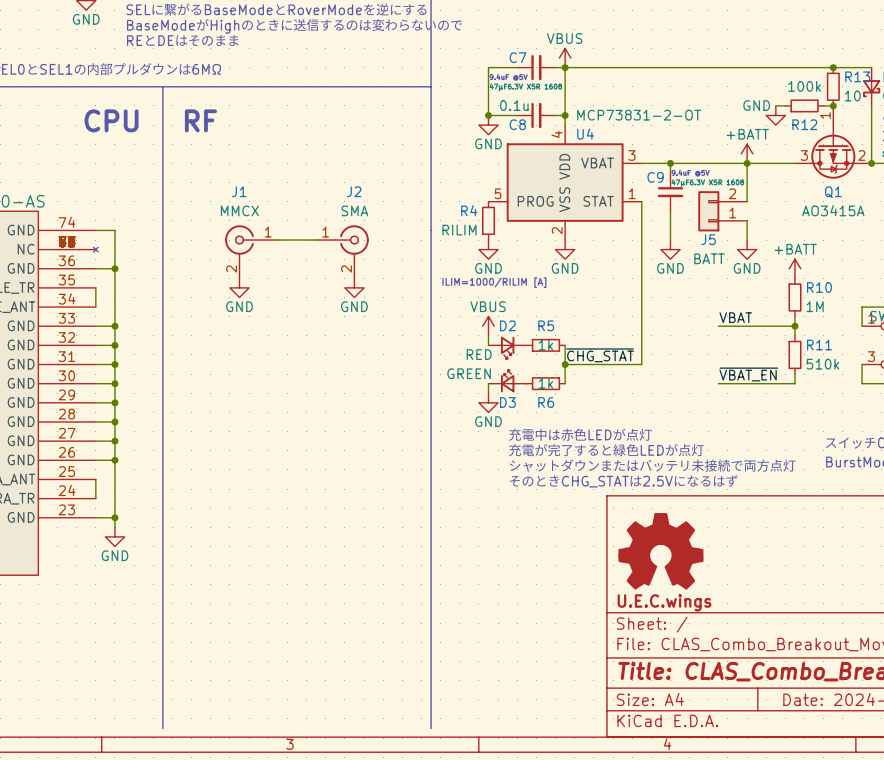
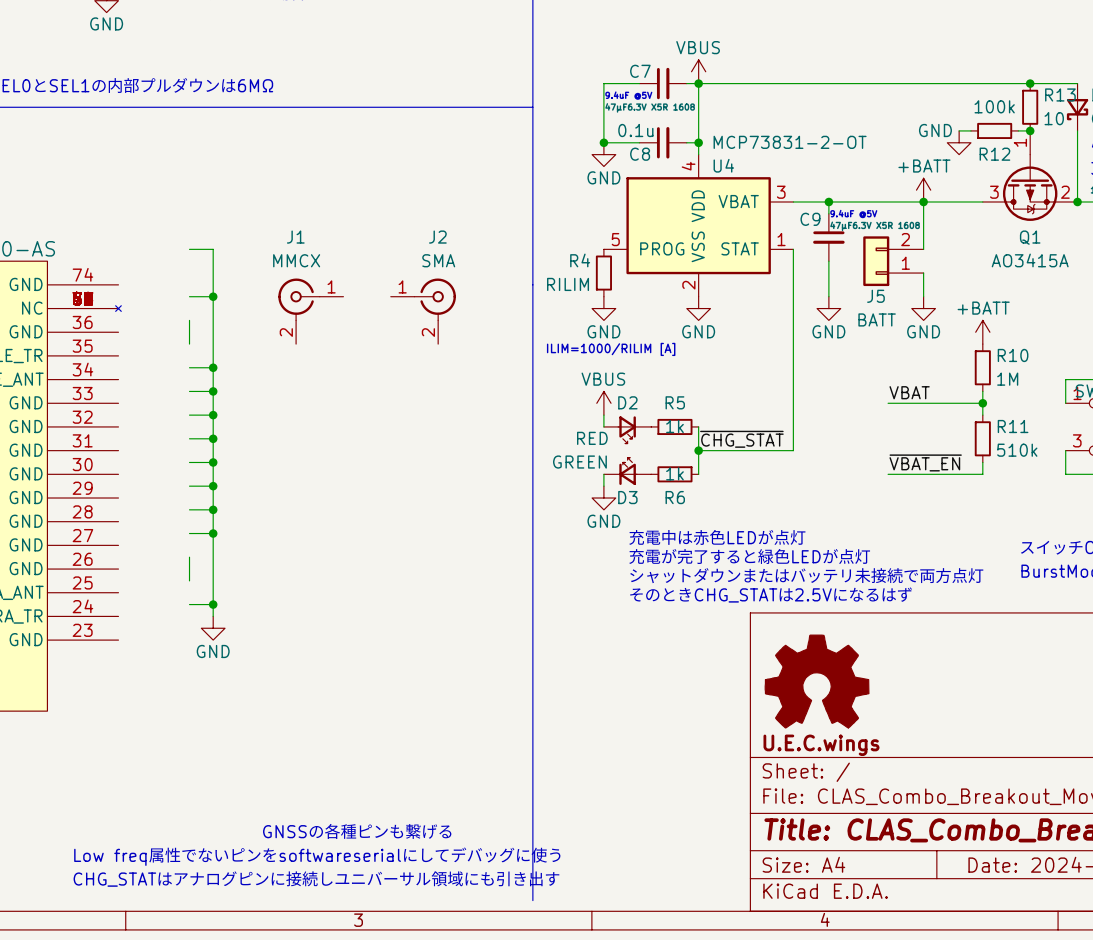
text: SELに繋がるBaseModeとRoverModeを逆にする (276, 9) -> none
text: BaseModeがHighのときに送信するのは変わらないので (294, 26) -> none
text: REとDEはそのまま (183, 40) -> none
line: (162, 86) (162, 728) -> none
text: CPU (111, 120) -> none
text: RF (200, 120) -> none
wire: (95, 230) (114, 230) (114, 527) -> (189, 249) (213, 249) (213, 616)
junction: none -> (213, 296)
wire: (277, 240) (316, 240) -> none
wire: (95, 268) (114, 268) -> (189, 296) (213, 296)
junction: (114, 268) -> none
wire: (95, 287) (95, 307) -> (189, 320) (189, 344)
power symbol: GND (239, 287) -> none
power symbol: GND (354, 287) -> none
junction: none -> (213, 367)
junction: none -> (213, 391)
wire: (95, 326) (114, 326) -> (189, 367) (213, 367)
junction: (114, 326) -> none
junction: none -> (213, 415)
wire: (95, 345) (114, 345) -> (189, 391) (213, 391)
junction: (114, 345) -> none
junction: none -> (213, 438)
wire: (95, 364) (114, 364) -> (189, 415) (213, 415)
junction: (114, 364) -> none
junction: none -> (213, 462)
wire: (95, 383) (114, 383) -> (189, 438) (213, 438)
junction: (114, 383) -> none
junction: none -> (213, 486)
wire: (95, 402) (114, 402) -> (189, 462) (213, 462)
junction: (114, 402) -> none
junction: none -> (213, 509)
wire: (95, 421) (114, 421) -> (189, 486) (213, 486)
junction: (114, 421) -> none
junction: none -> (213, 533)
wire: (95, 441) (114, 441) -> (189, 509) (213, 509)
junction: (114, 441) -> none
wire: (95, 460) (114, 460) -> (189, 533) (213, 533)
junction: (114, 460) -> none
wire: (95, 479) (95, 498) -> (189, 557) (189, 580)
junction: none -> (213, 604)
wire: (95, 517) (114, 517) -> (189, 604) (213, 604)
junction: (114, 517) -> none
power symbol position: GND (114, 536) -> GND (213, 628)
text: none -> GNSSの各種ピンも繋げる (357, 831)
text: none -> Low freq属性でないピンをsoftwareserialにしてデバッグに使う (317, 856)
text: none -> CHG_STATはアナログピンに接続しユニバーサル領域にも引き出す (316, 878)

